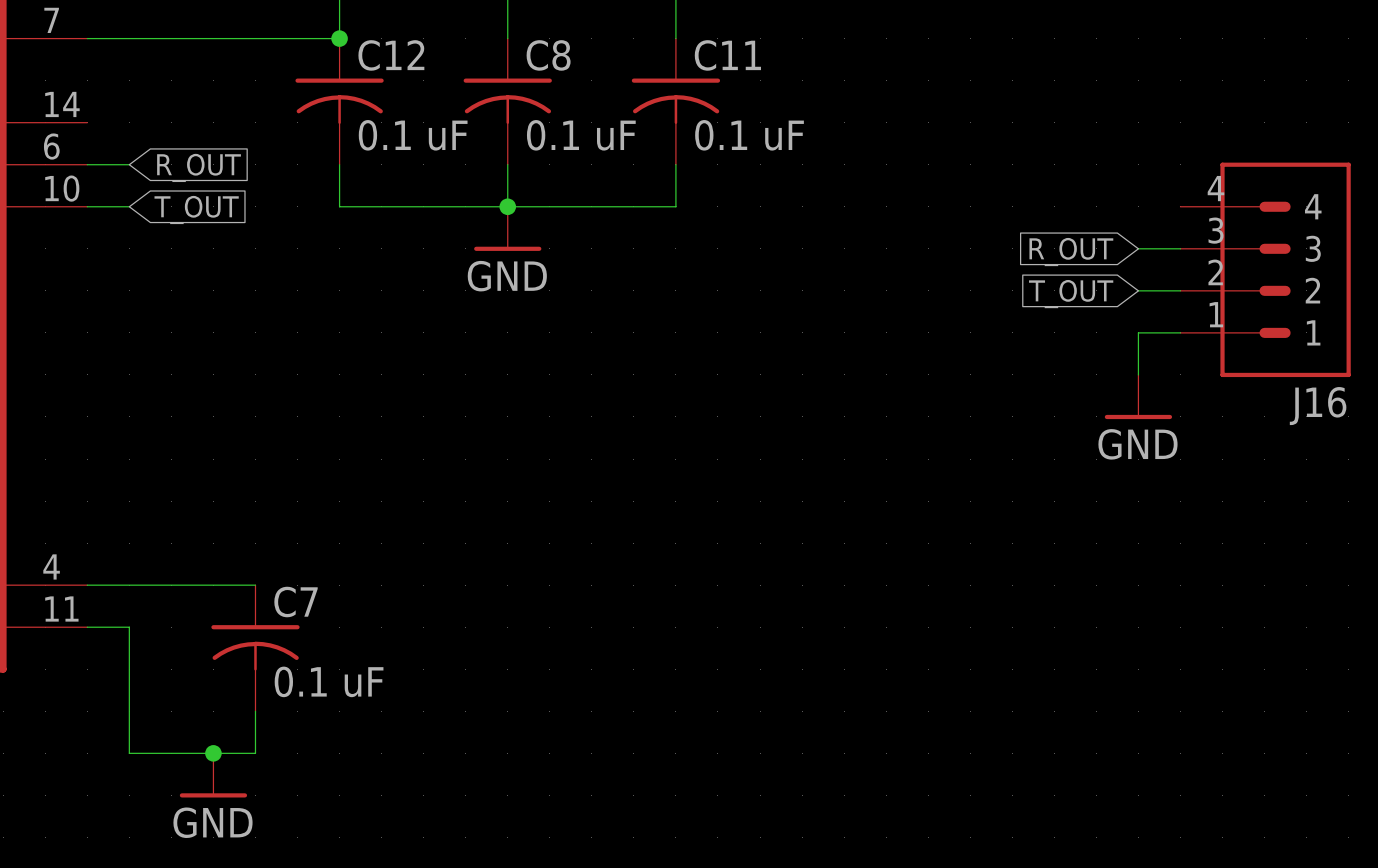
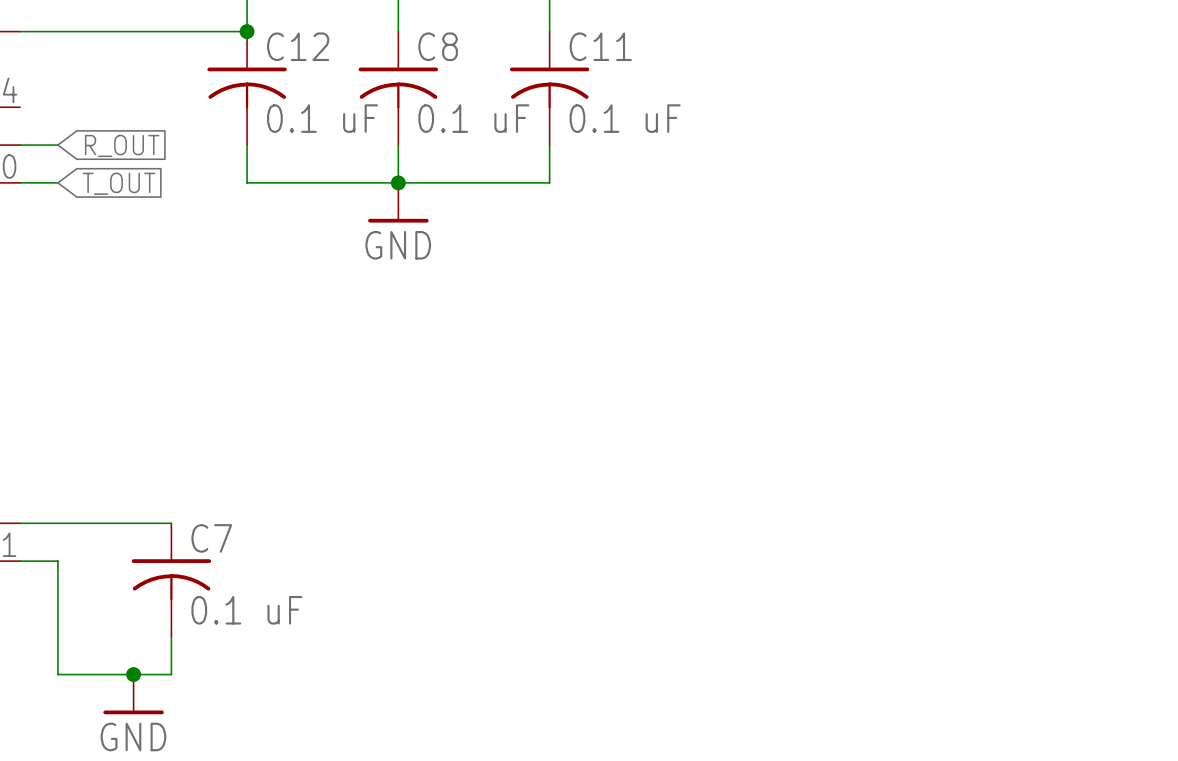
wire: (1138, 248) (1180, 248) -> none
global label: R_OUT (1071, 252) -> none
J16: (1265, 269) -> none
wire: (1138, 290) (1180, 290) -> none
global label: T_OUT (1071, 294) -> none
wire: (1180, 332) (1138, 332) (1138, 374) -> none
power symbol: GND (1138, 397) -> none

